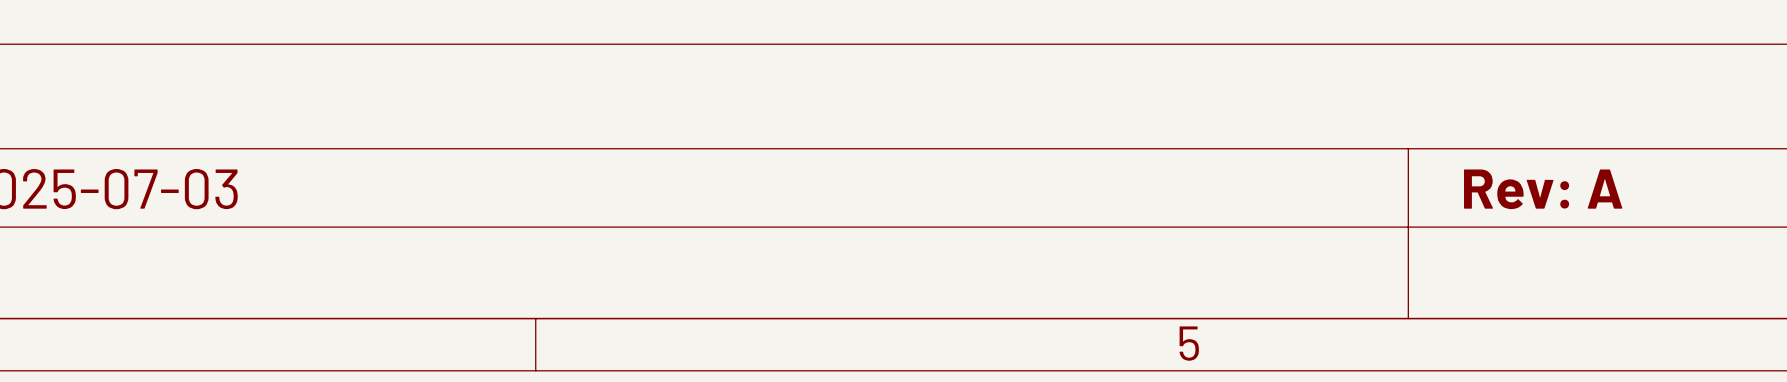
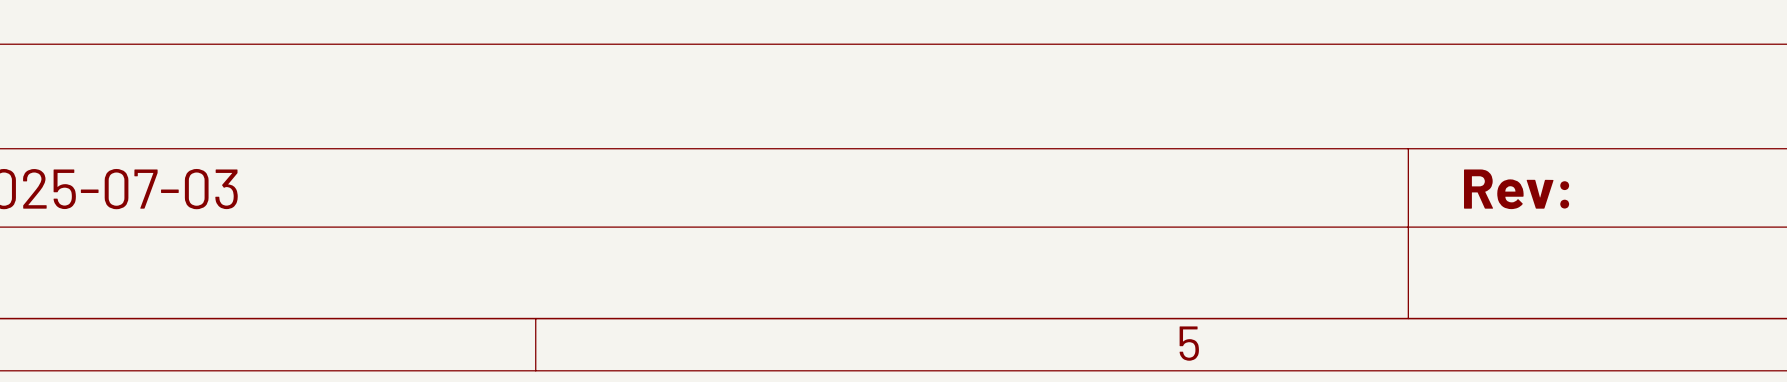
title block: Rev: A (1543, 189) -> Rev: (1516, 189)

